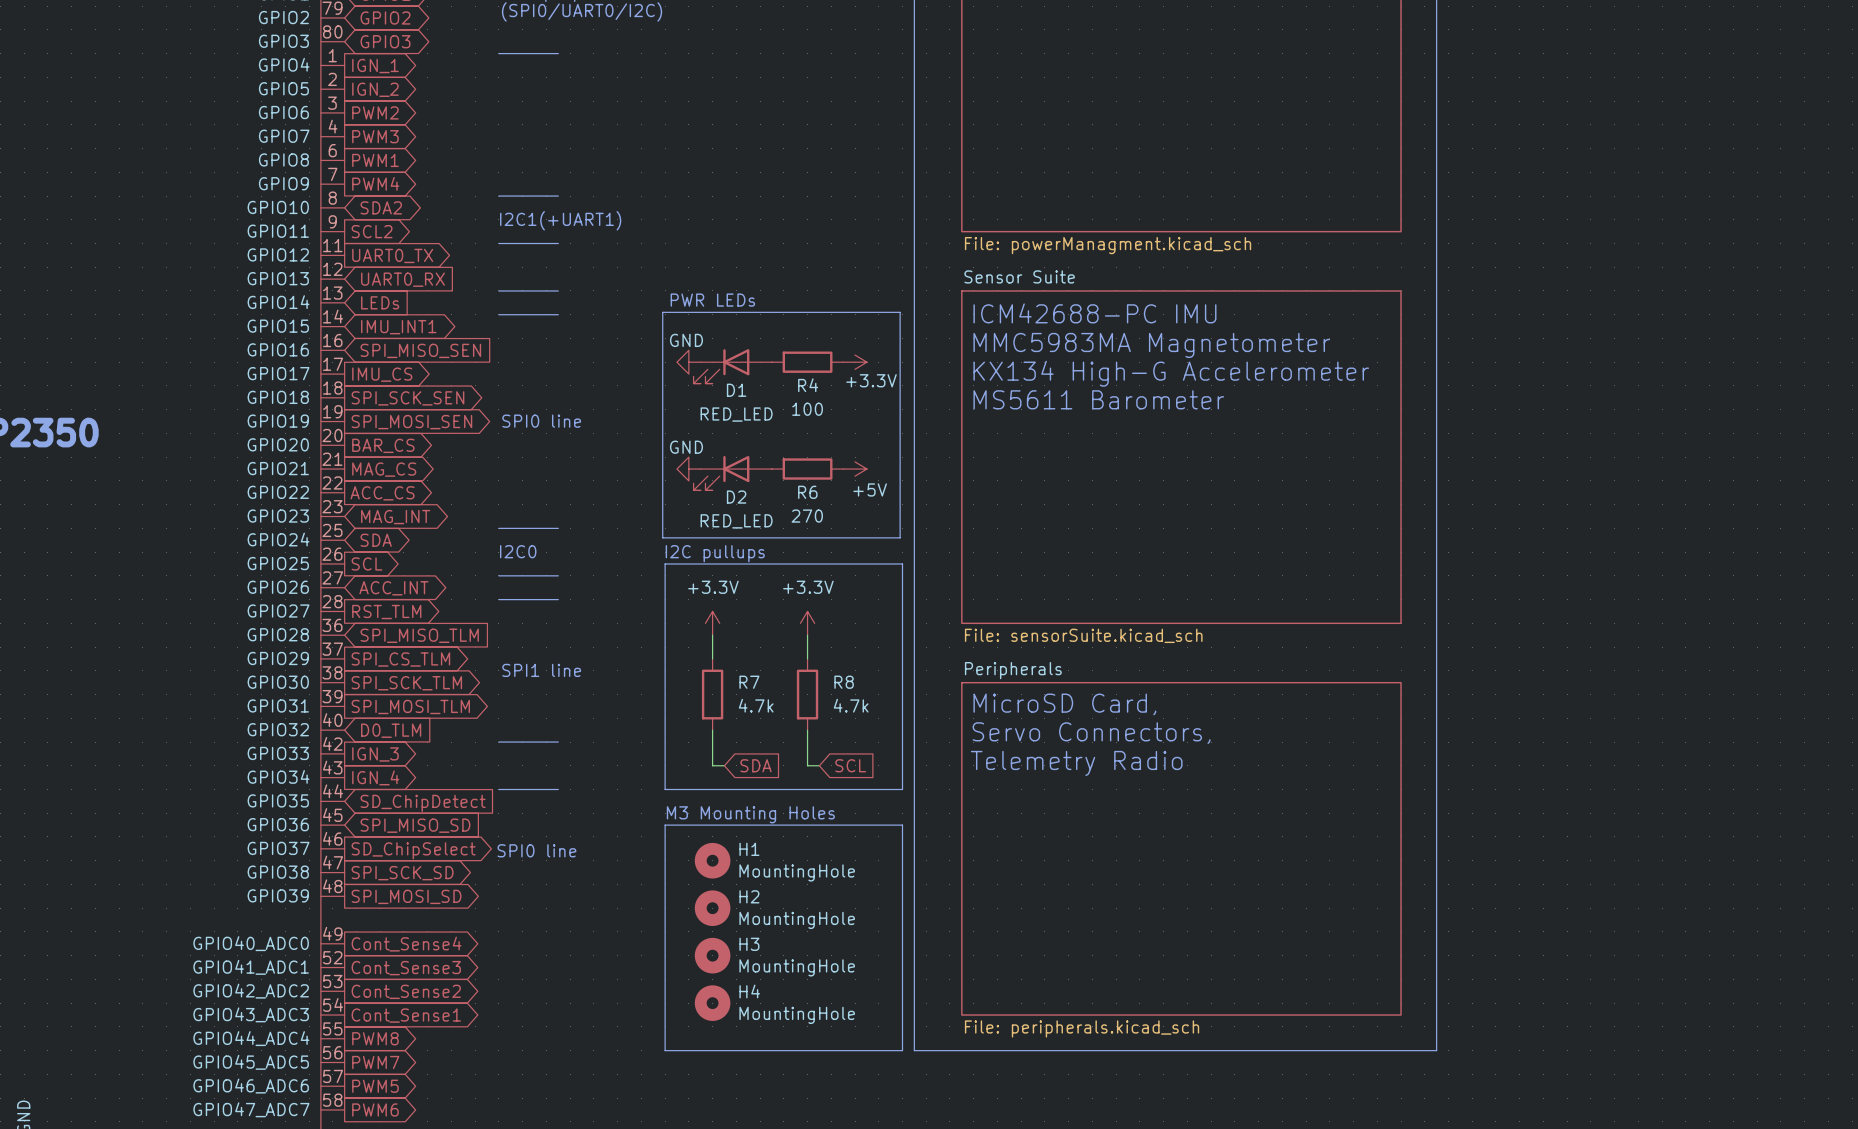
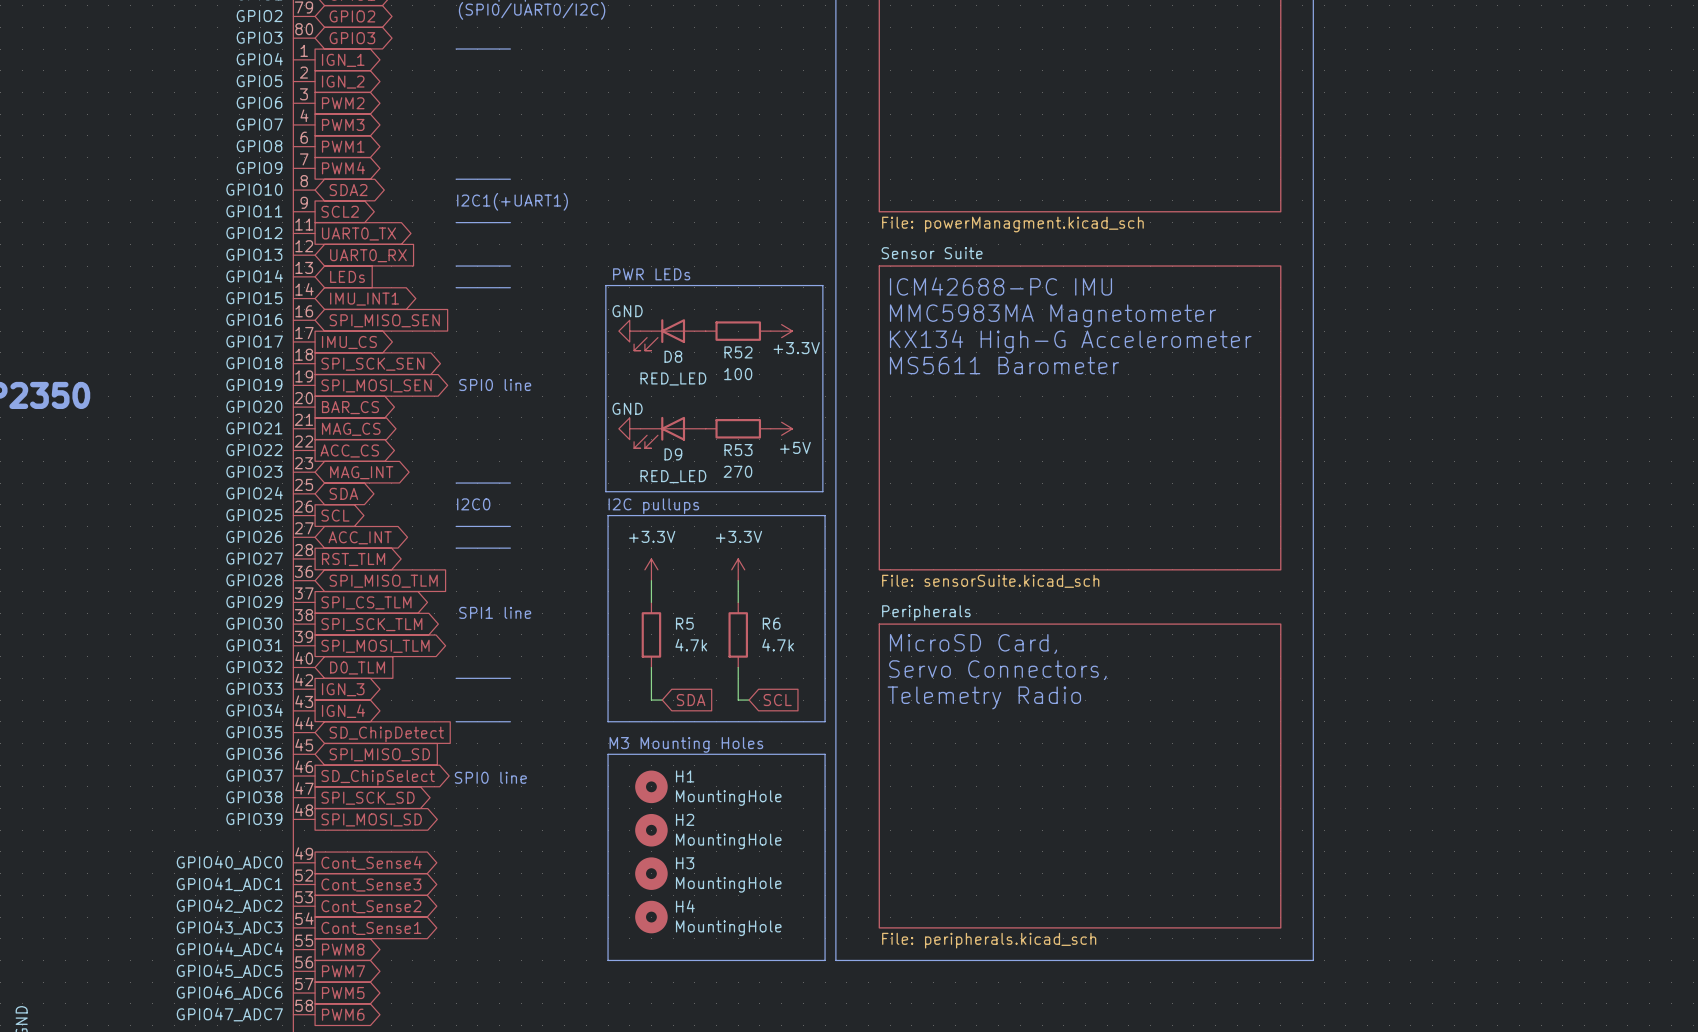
R4 name: R4 (808, 385) -> R52 (738, 352)
D1 name: D1 (736, 390) -> D8 (673, 356)
R6 name: R6 (807, 492) -> R53 (738, 450)
D2 name: D2 (736, 497) -> D9 (673, 454)
R7 name: R7 (749, 682) -> R5 (684, 623)
R8 name: R8 (844, 682) -> R6 (771, 623)

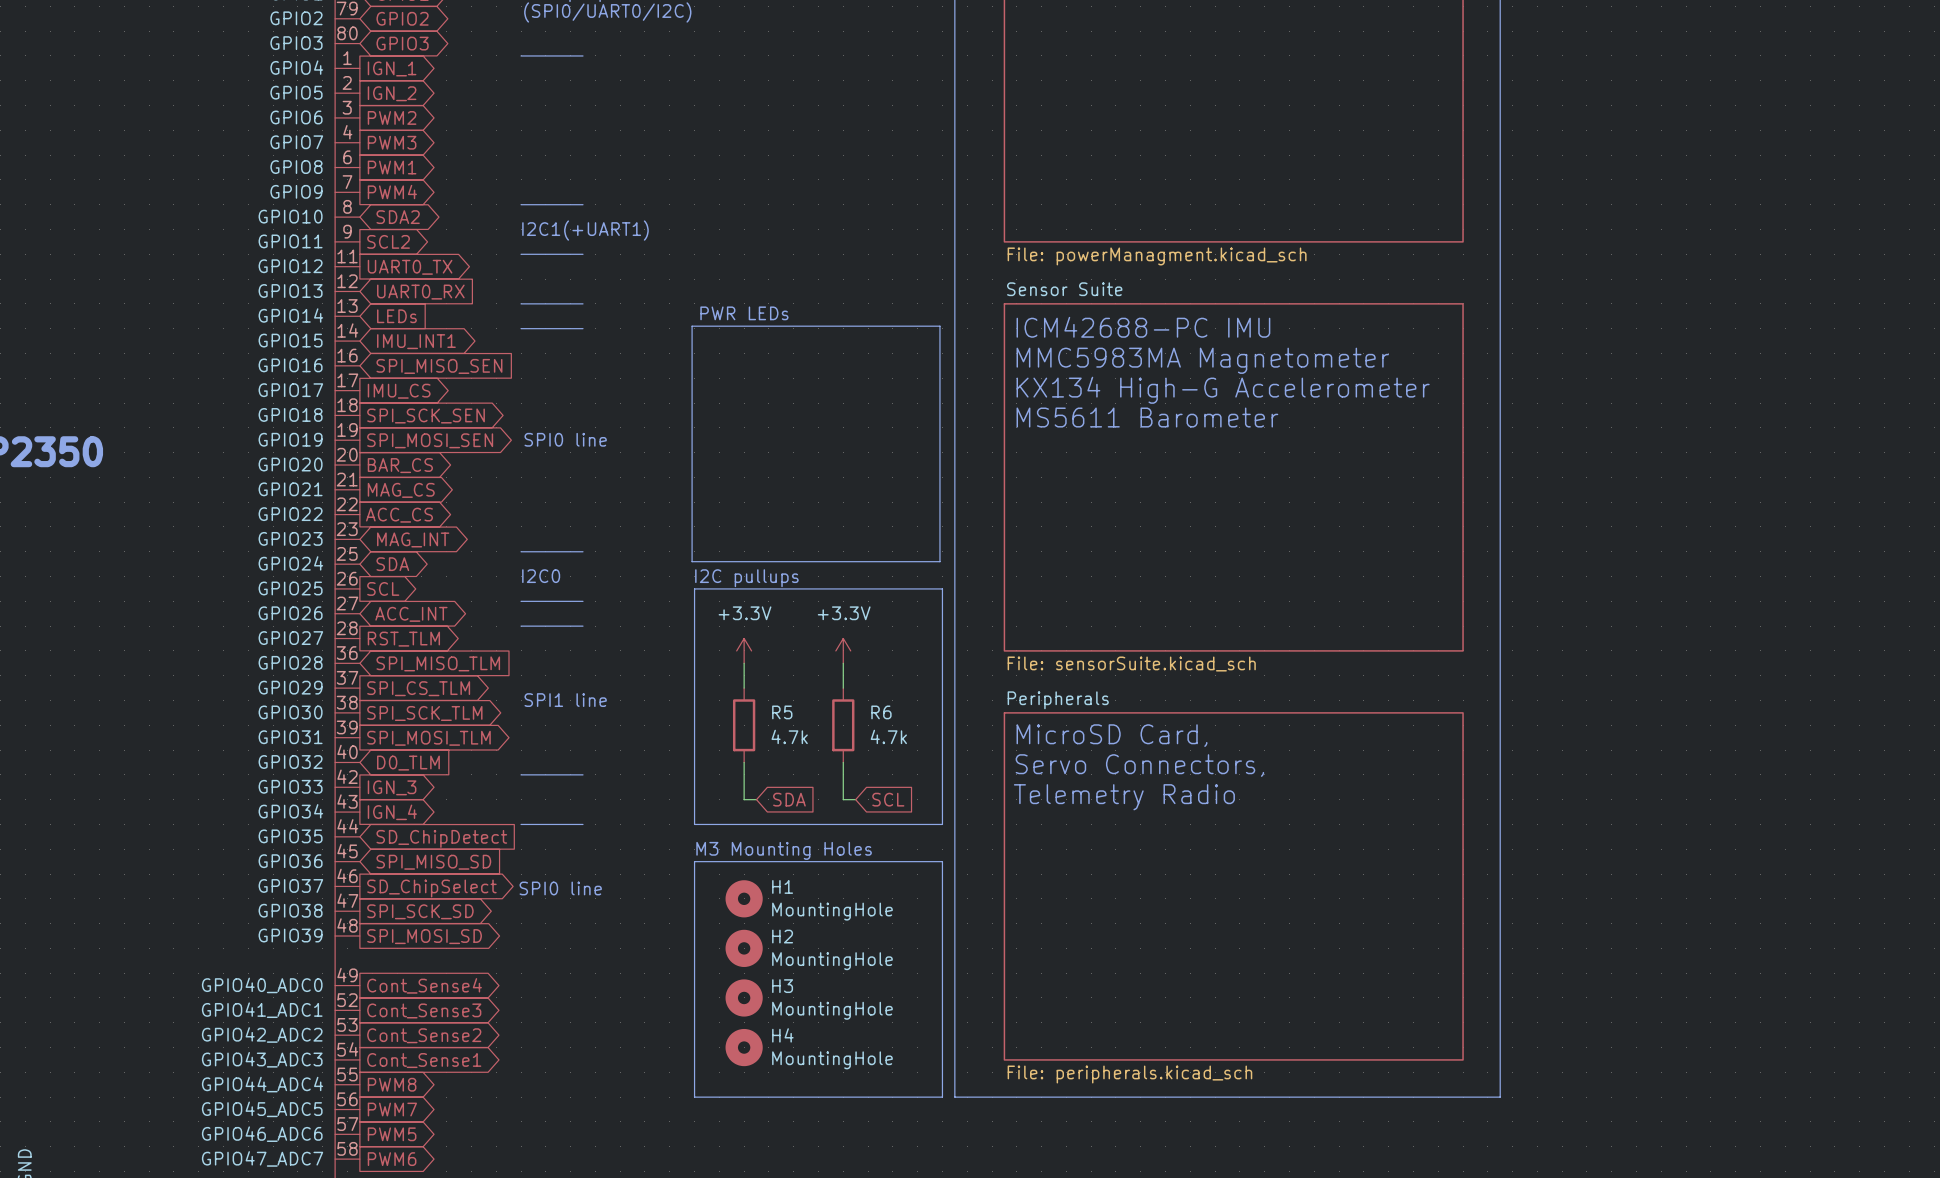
power symbol: GND (629, 331) -> none
R52: 100 (738, 331) -> none
power symbol: +3.3V (781, 331) -> none
D8: RED_LED (669, 334) -> none
power symbol: GND (629, 428) -> none
R53: 270 (738, 428) -> none
power symbol: +5V (781, 428) -> none
D9: RED_LED (669, 432) -> none

